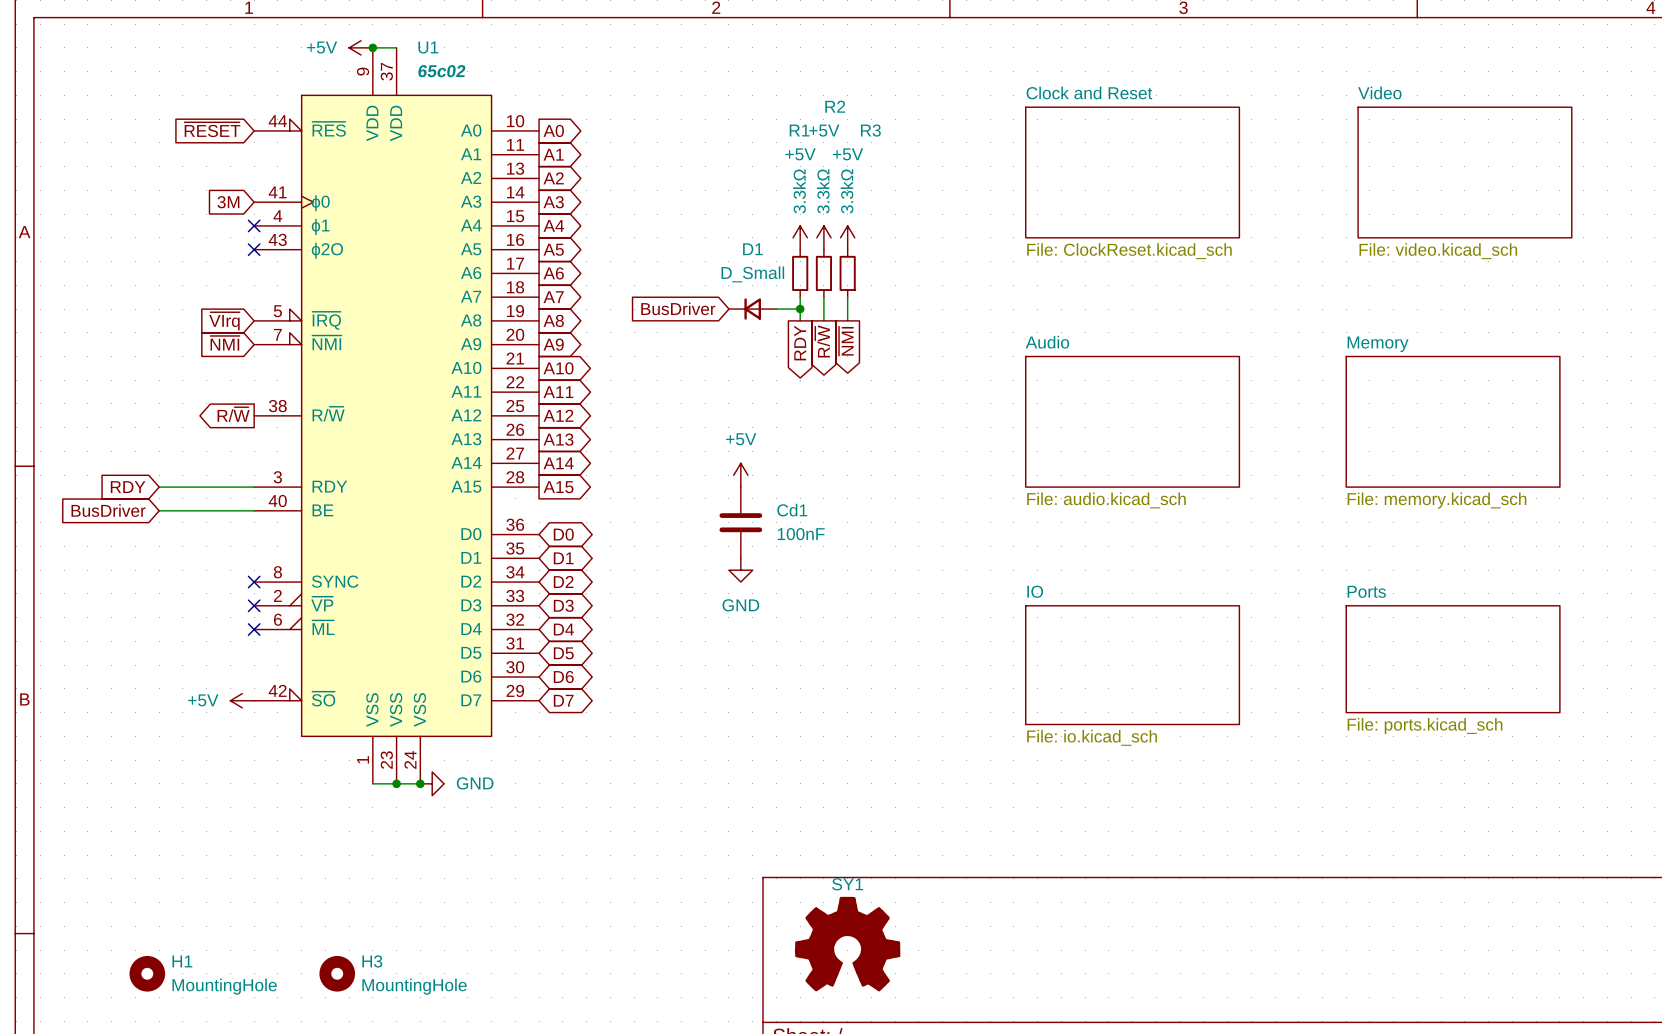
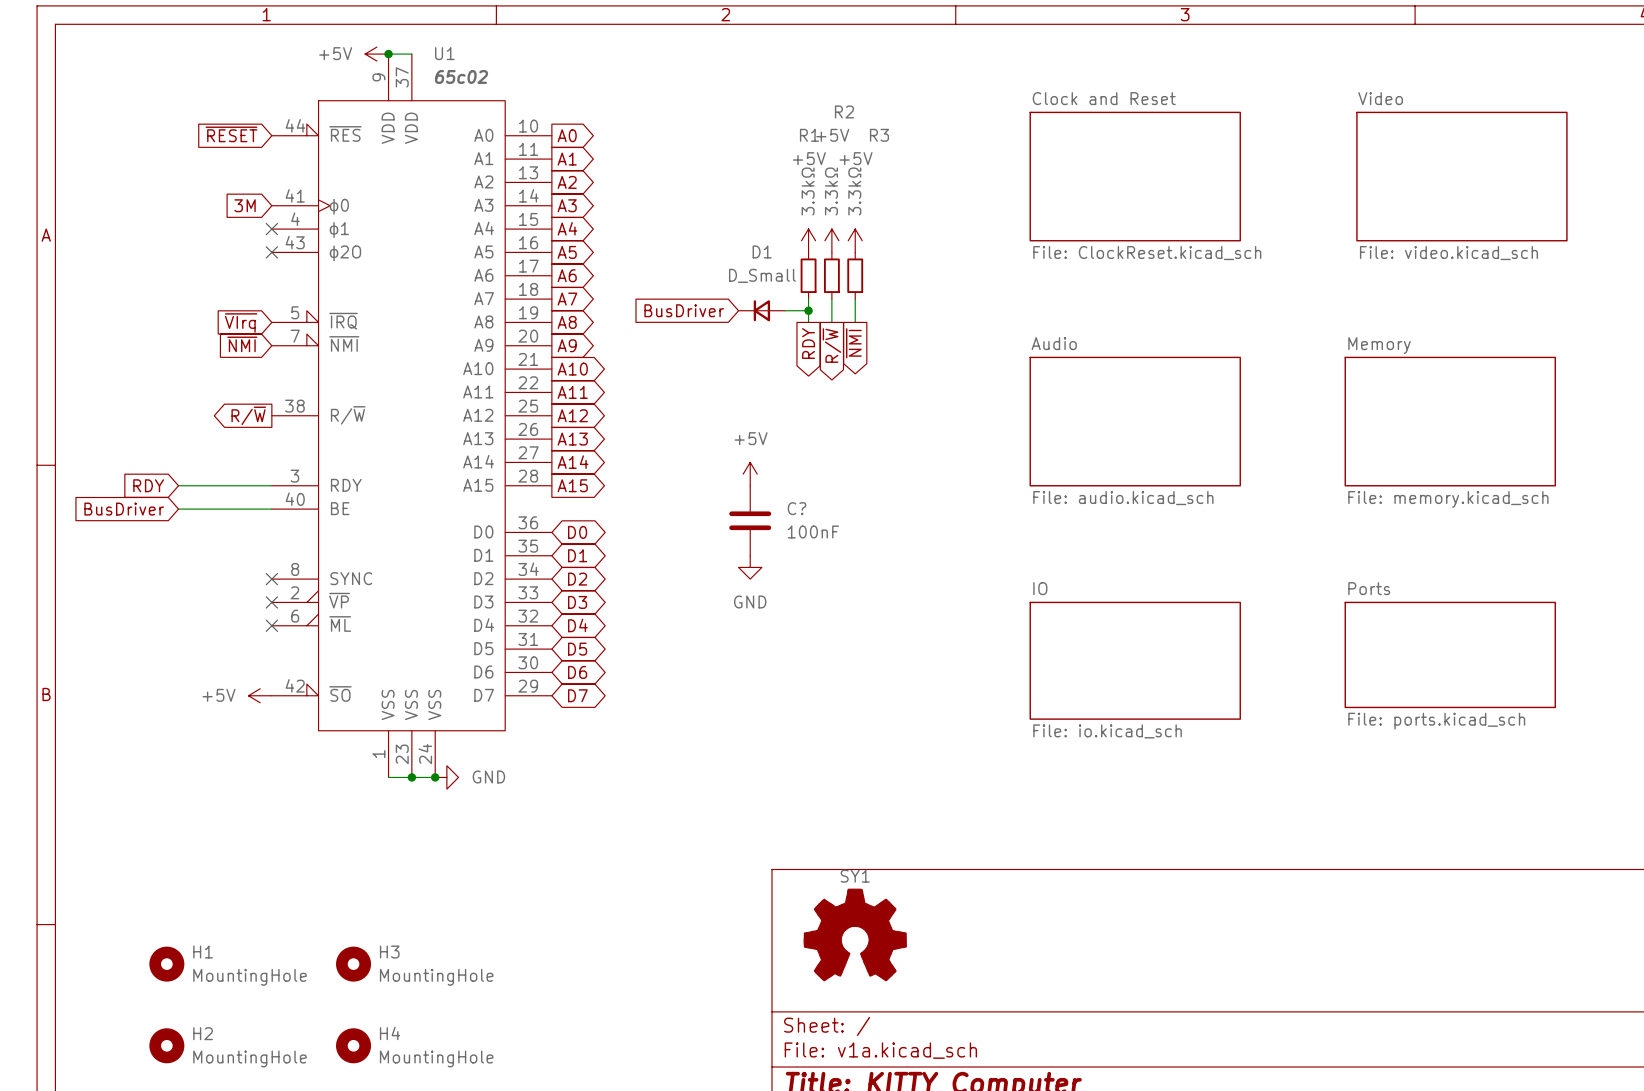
Cd1 name: Cd1 (792, 510) -> C? (796, 508)

